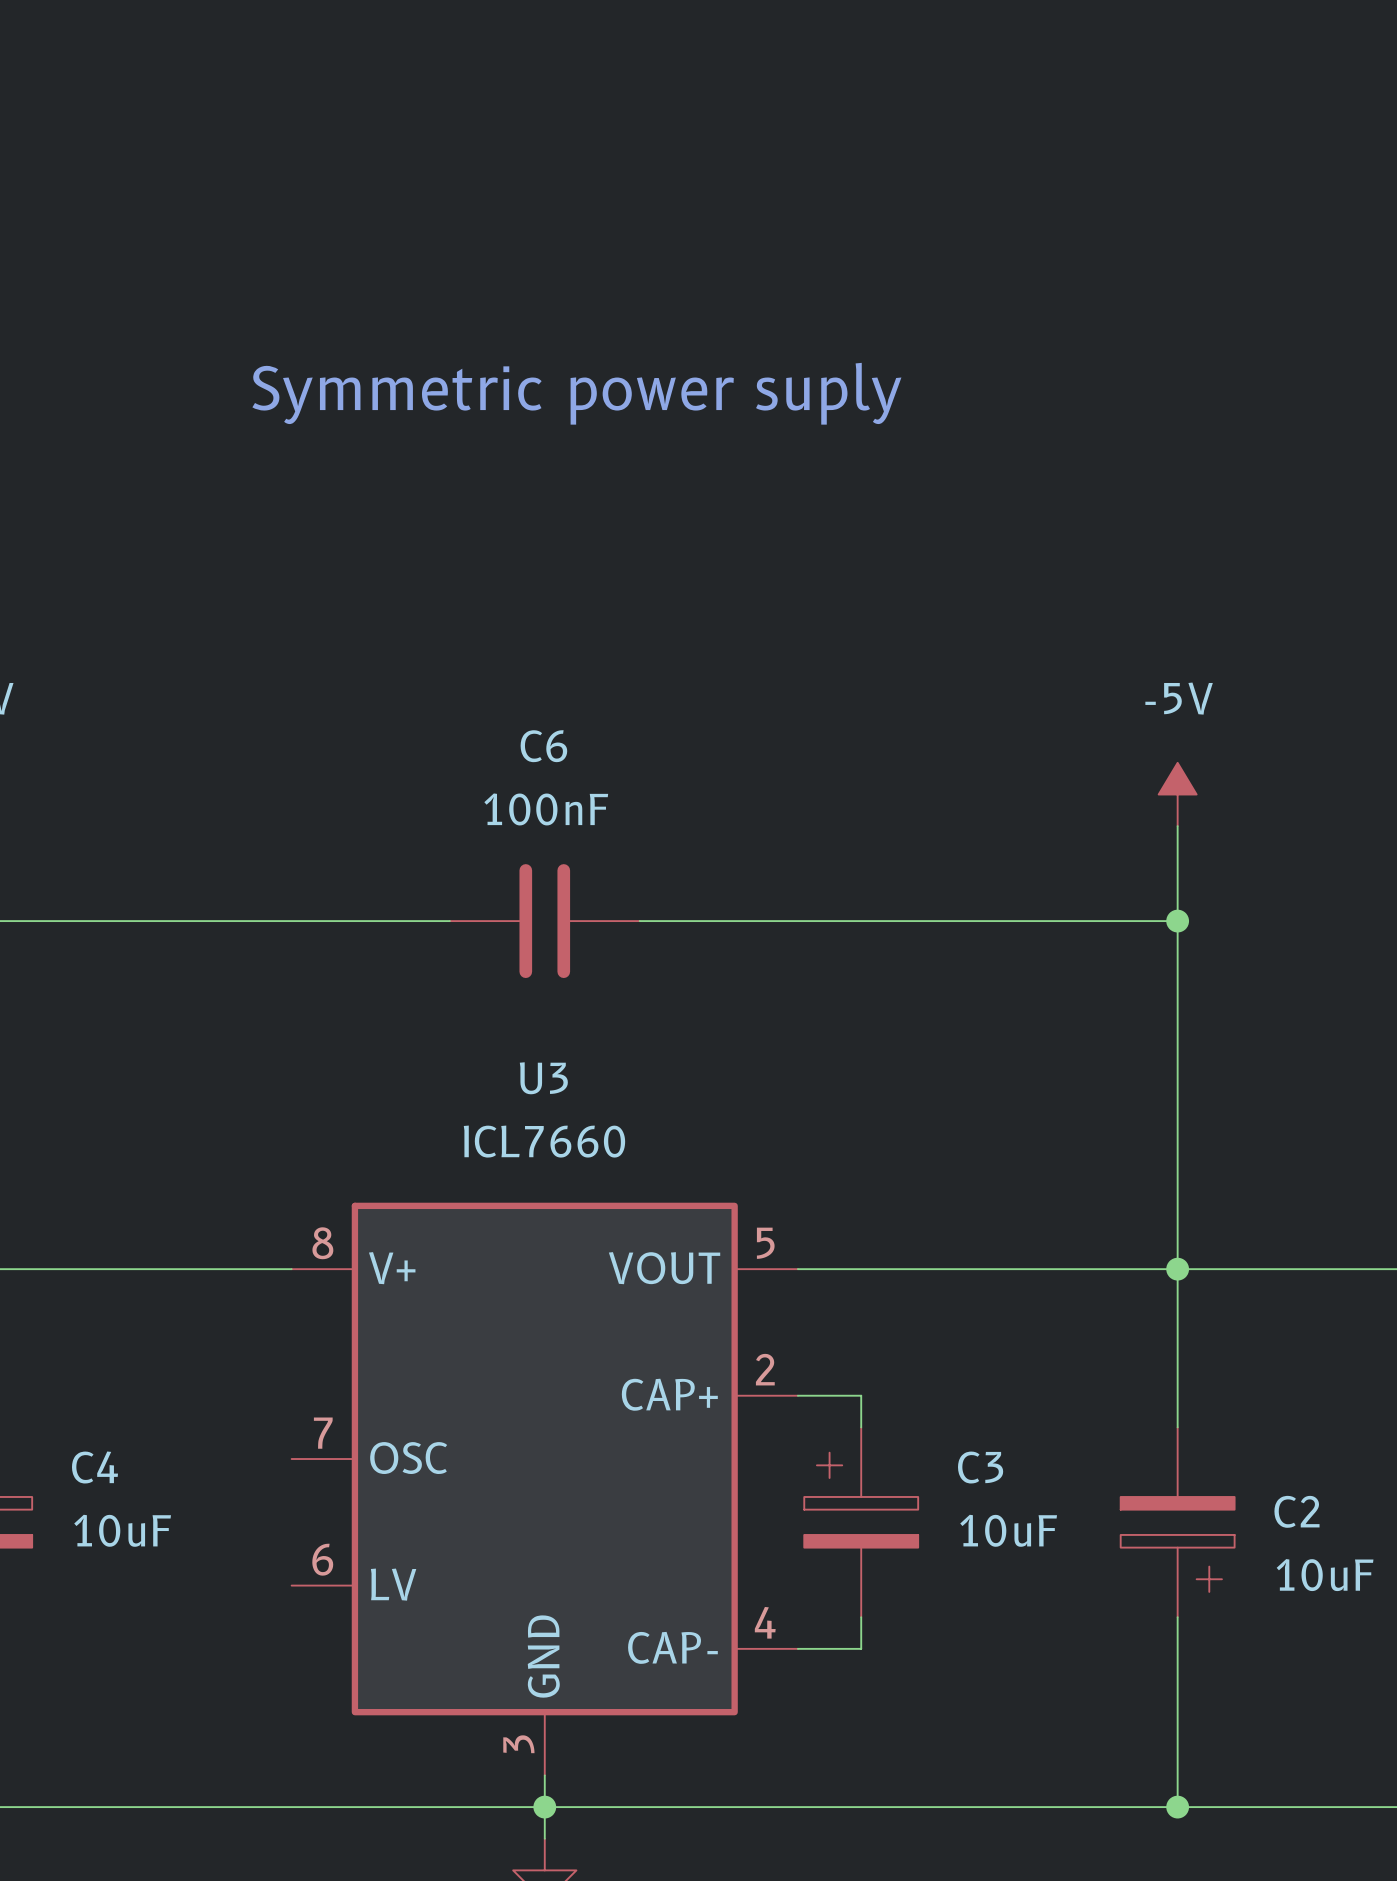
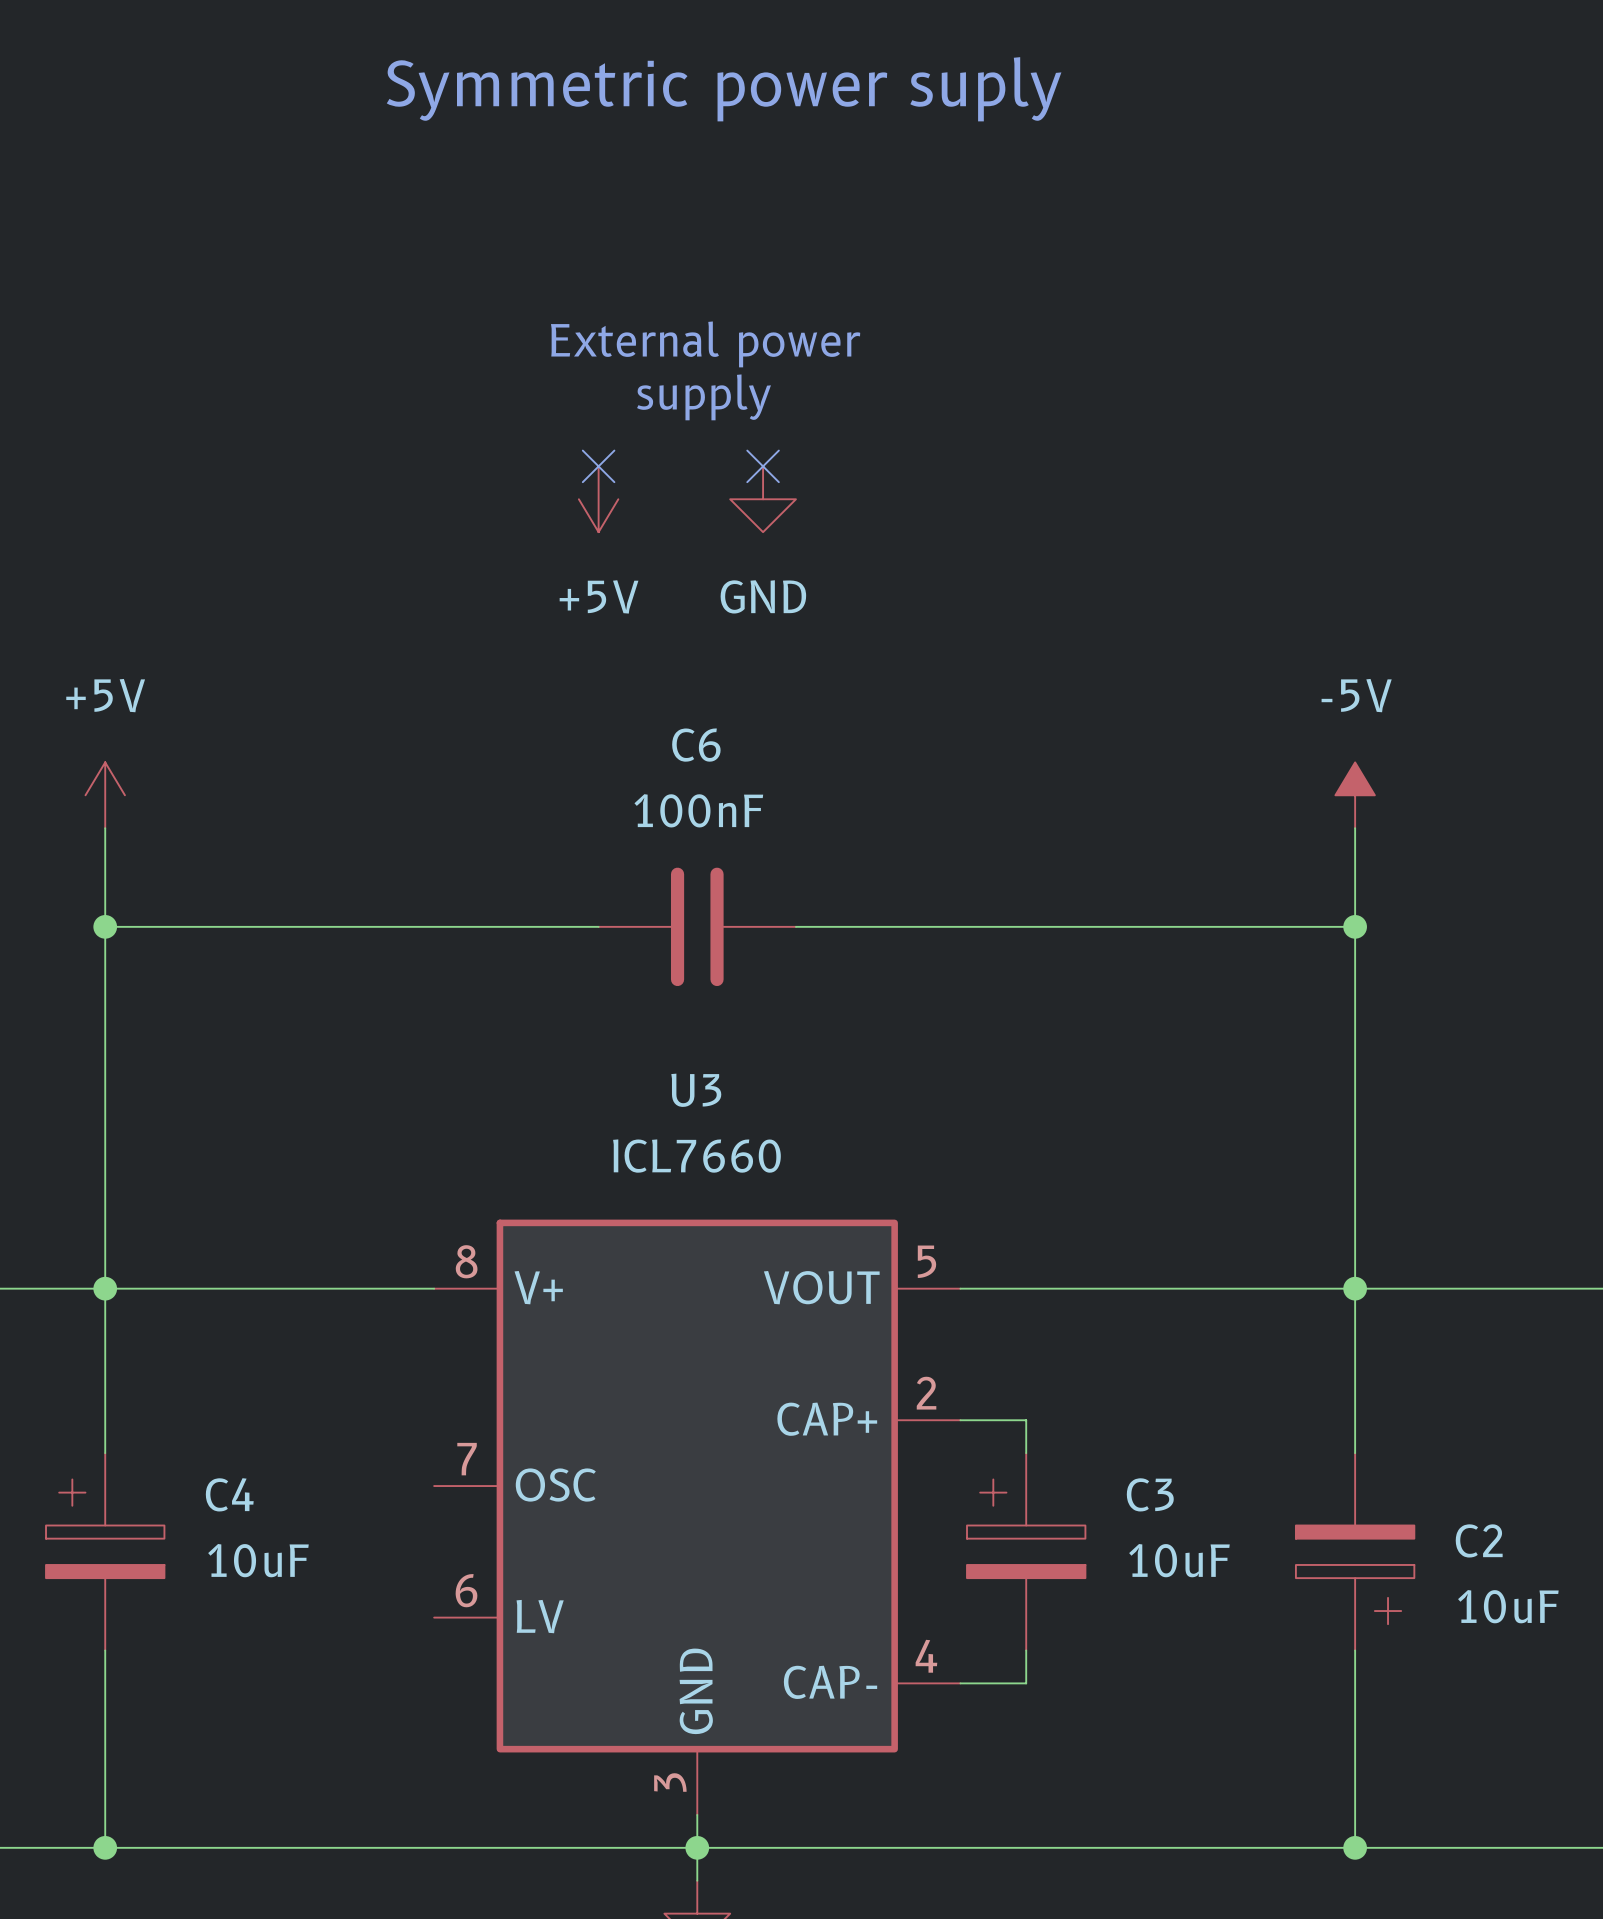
text: none -> External power (705, 344)
text position: Symmetric power suply (576, 393) -> Symmetric power suply (724, 89)
text: none -> supply (704, 397)
no-connect mark: none -> (598, 466)
no-connect mark: none -> (763, 466)
power symbol: none -> +5V (598, 499)
power symbol: none -> GND (763, 499)

